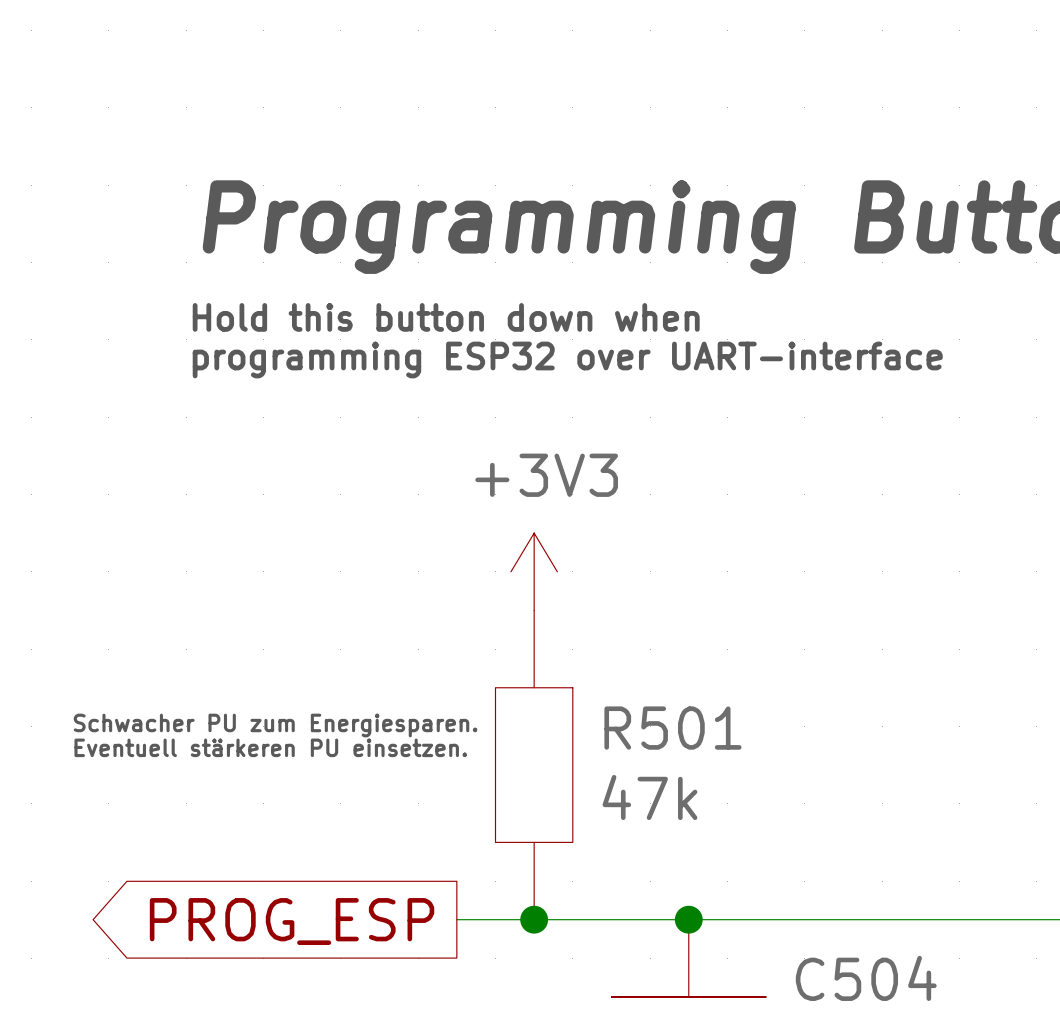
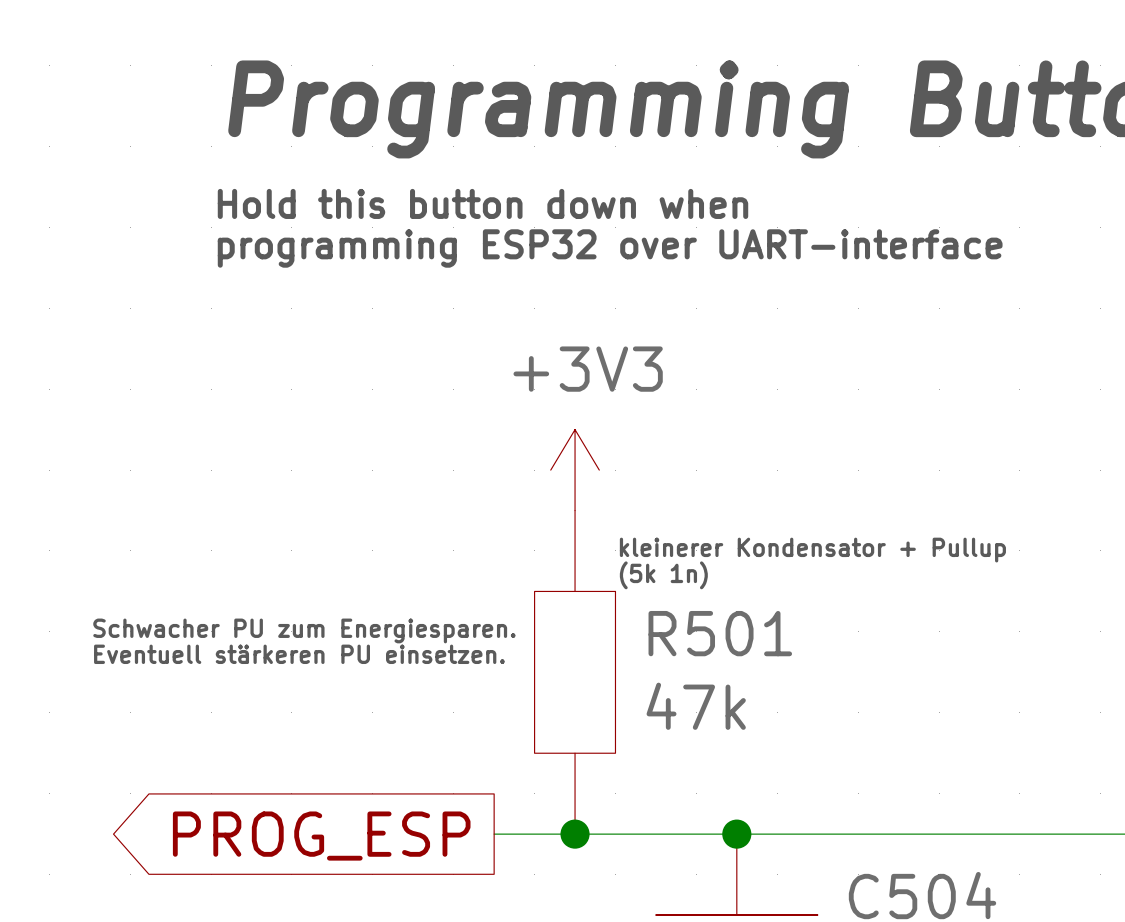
text: none -> kleinerer Kondensator + Pullup (812, 550)
text: none -> (5k 1n) (663, 575)

